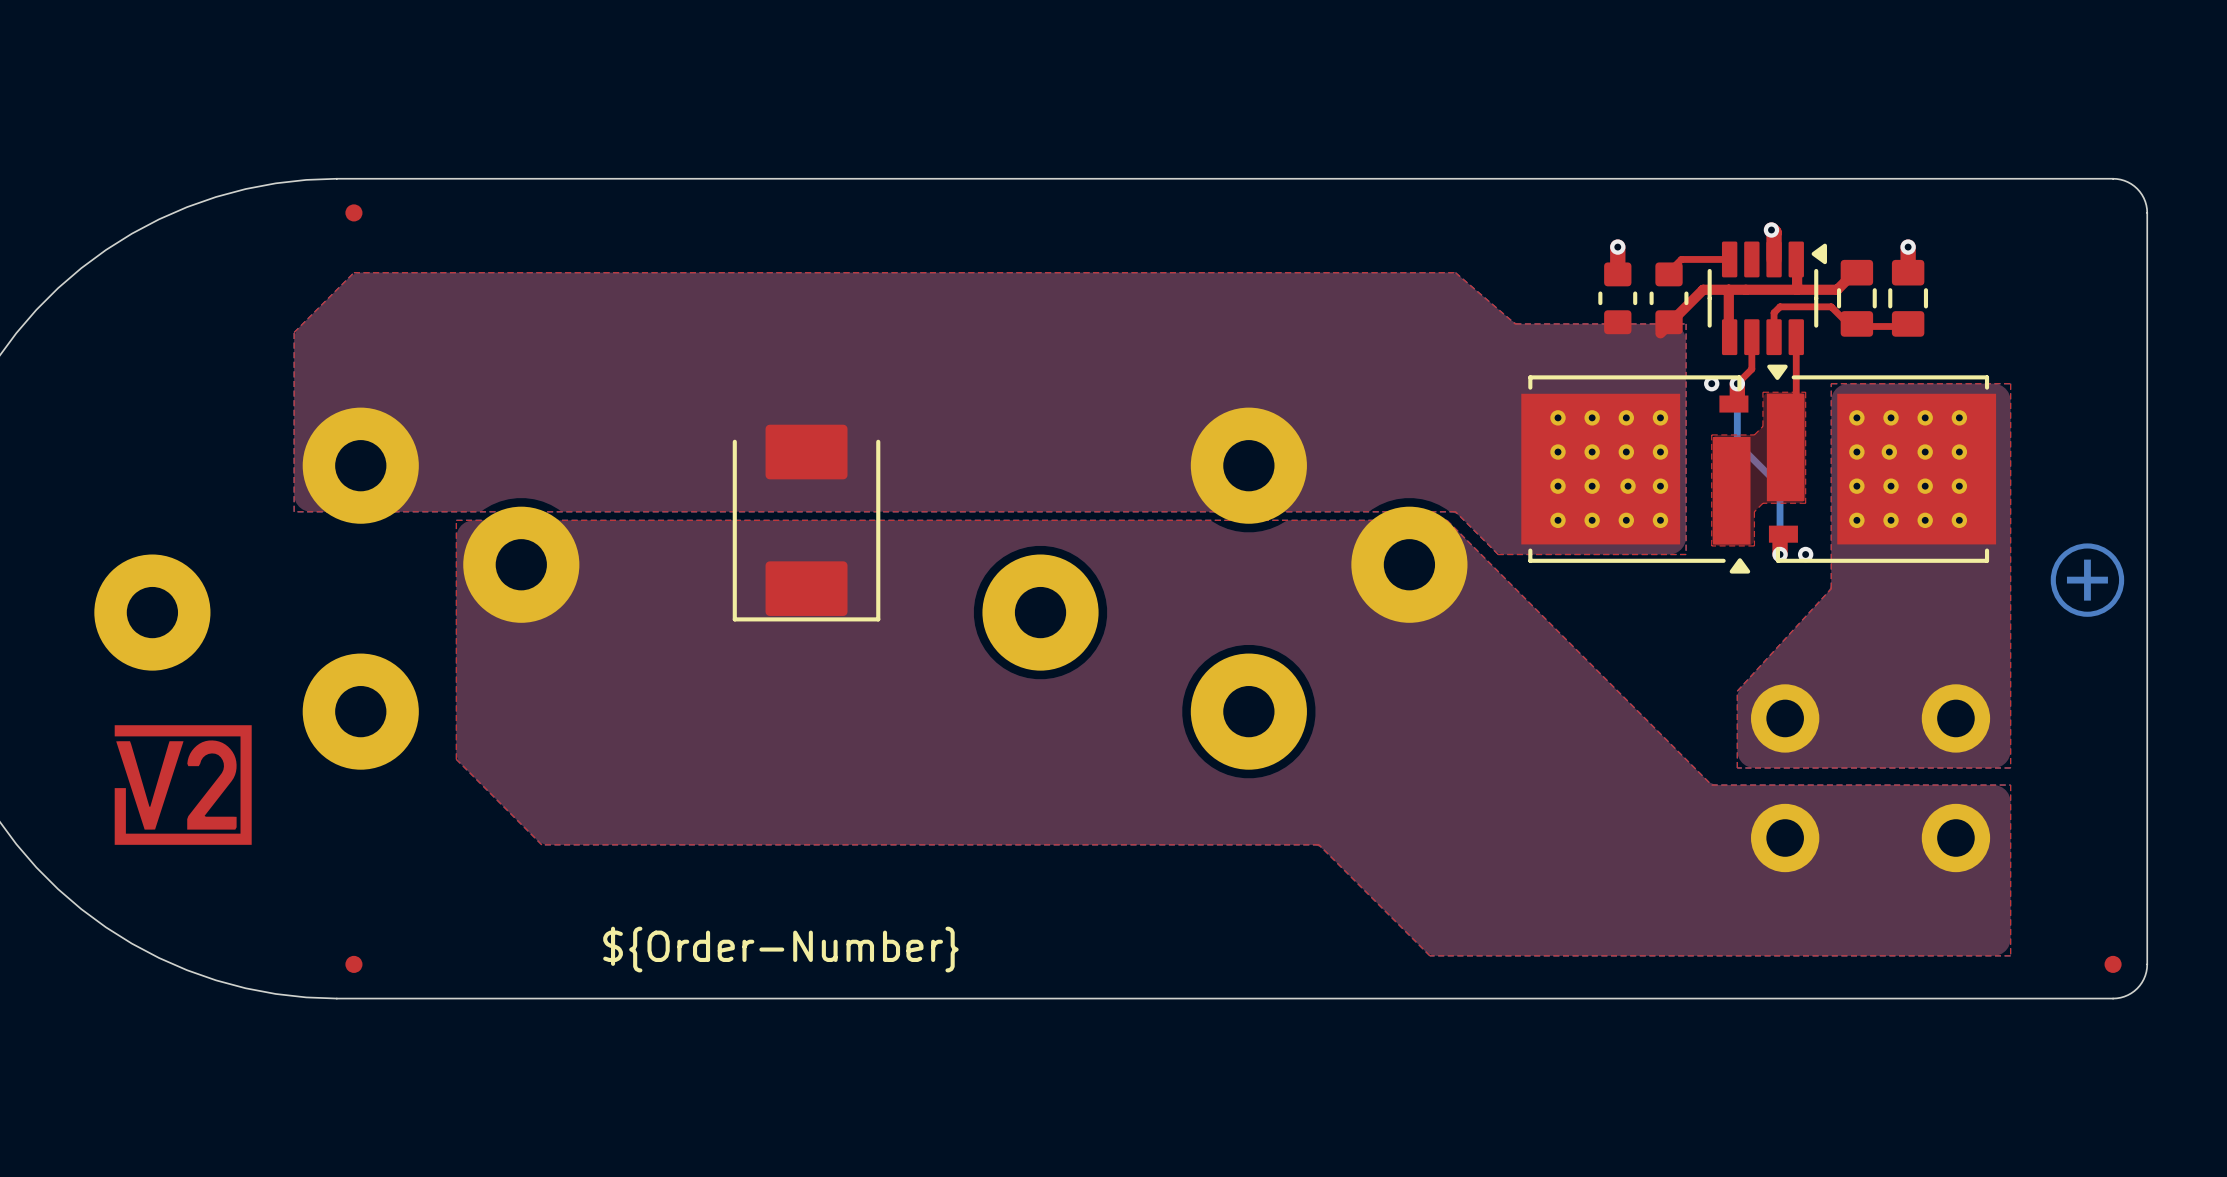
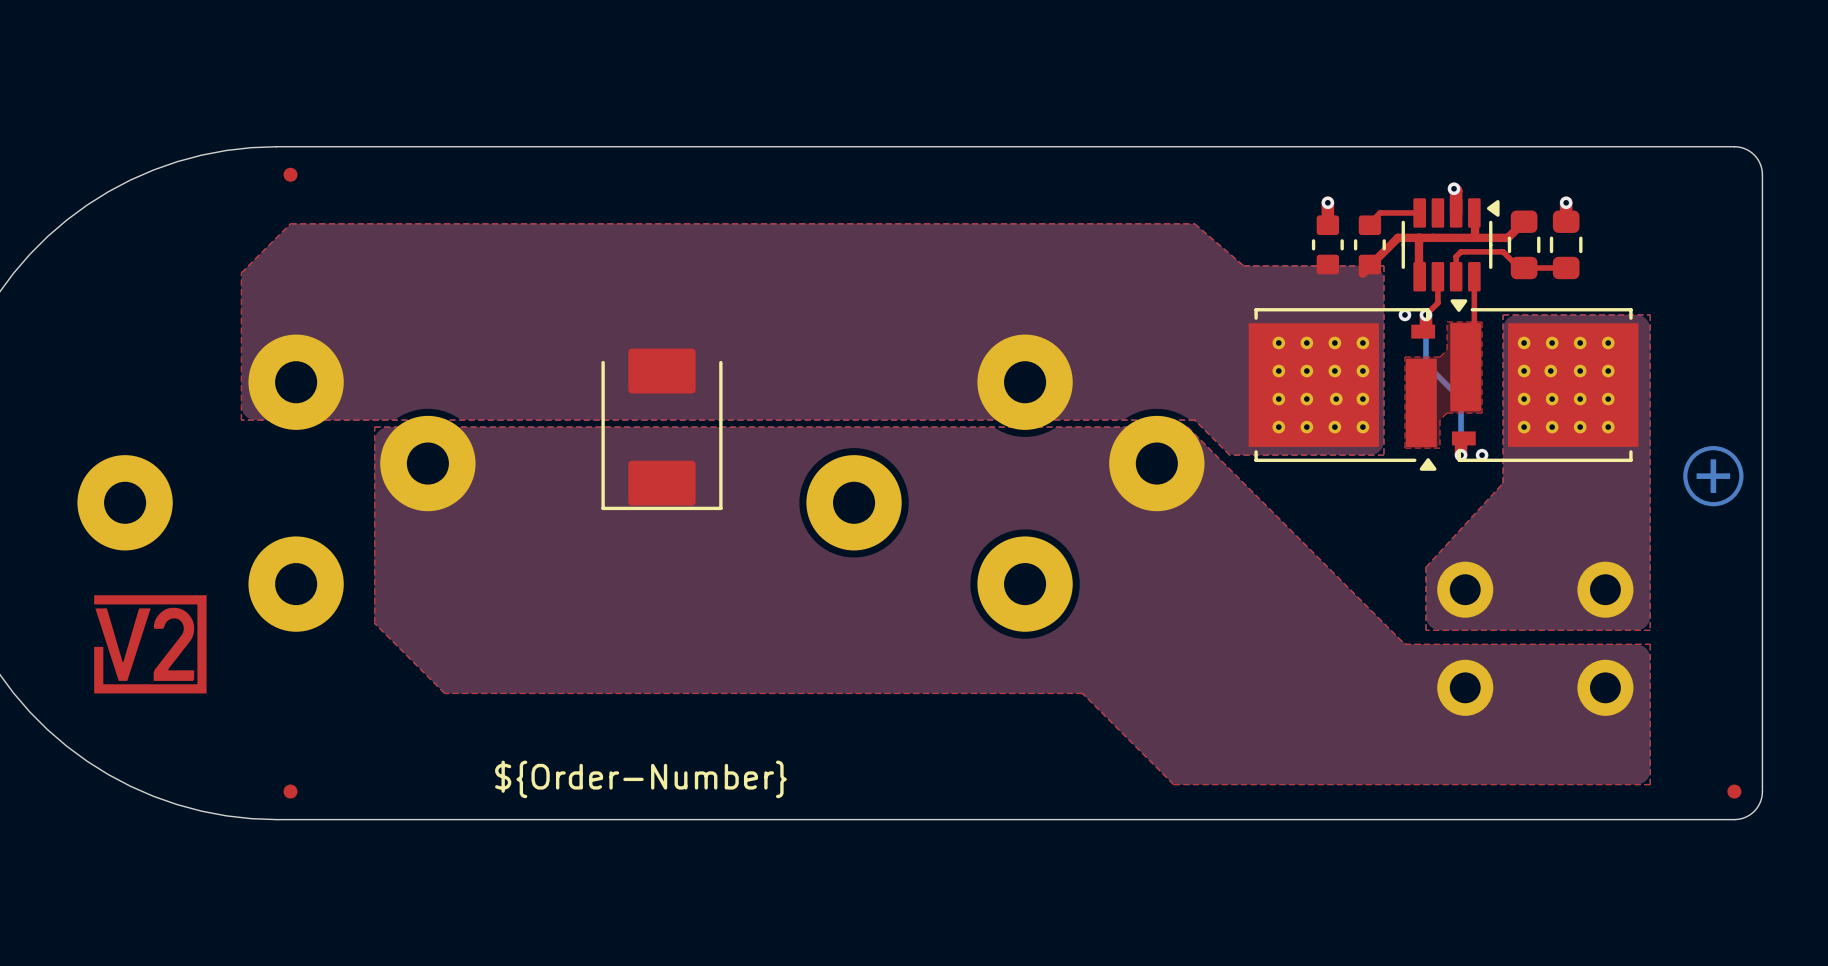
part footprint: [1836, 259, 1877, 337] -> [1507, 210, 1541, 280]
part footprint: [1888, 259, 1929, 337] -> [1549, 210, 1583, 280]

